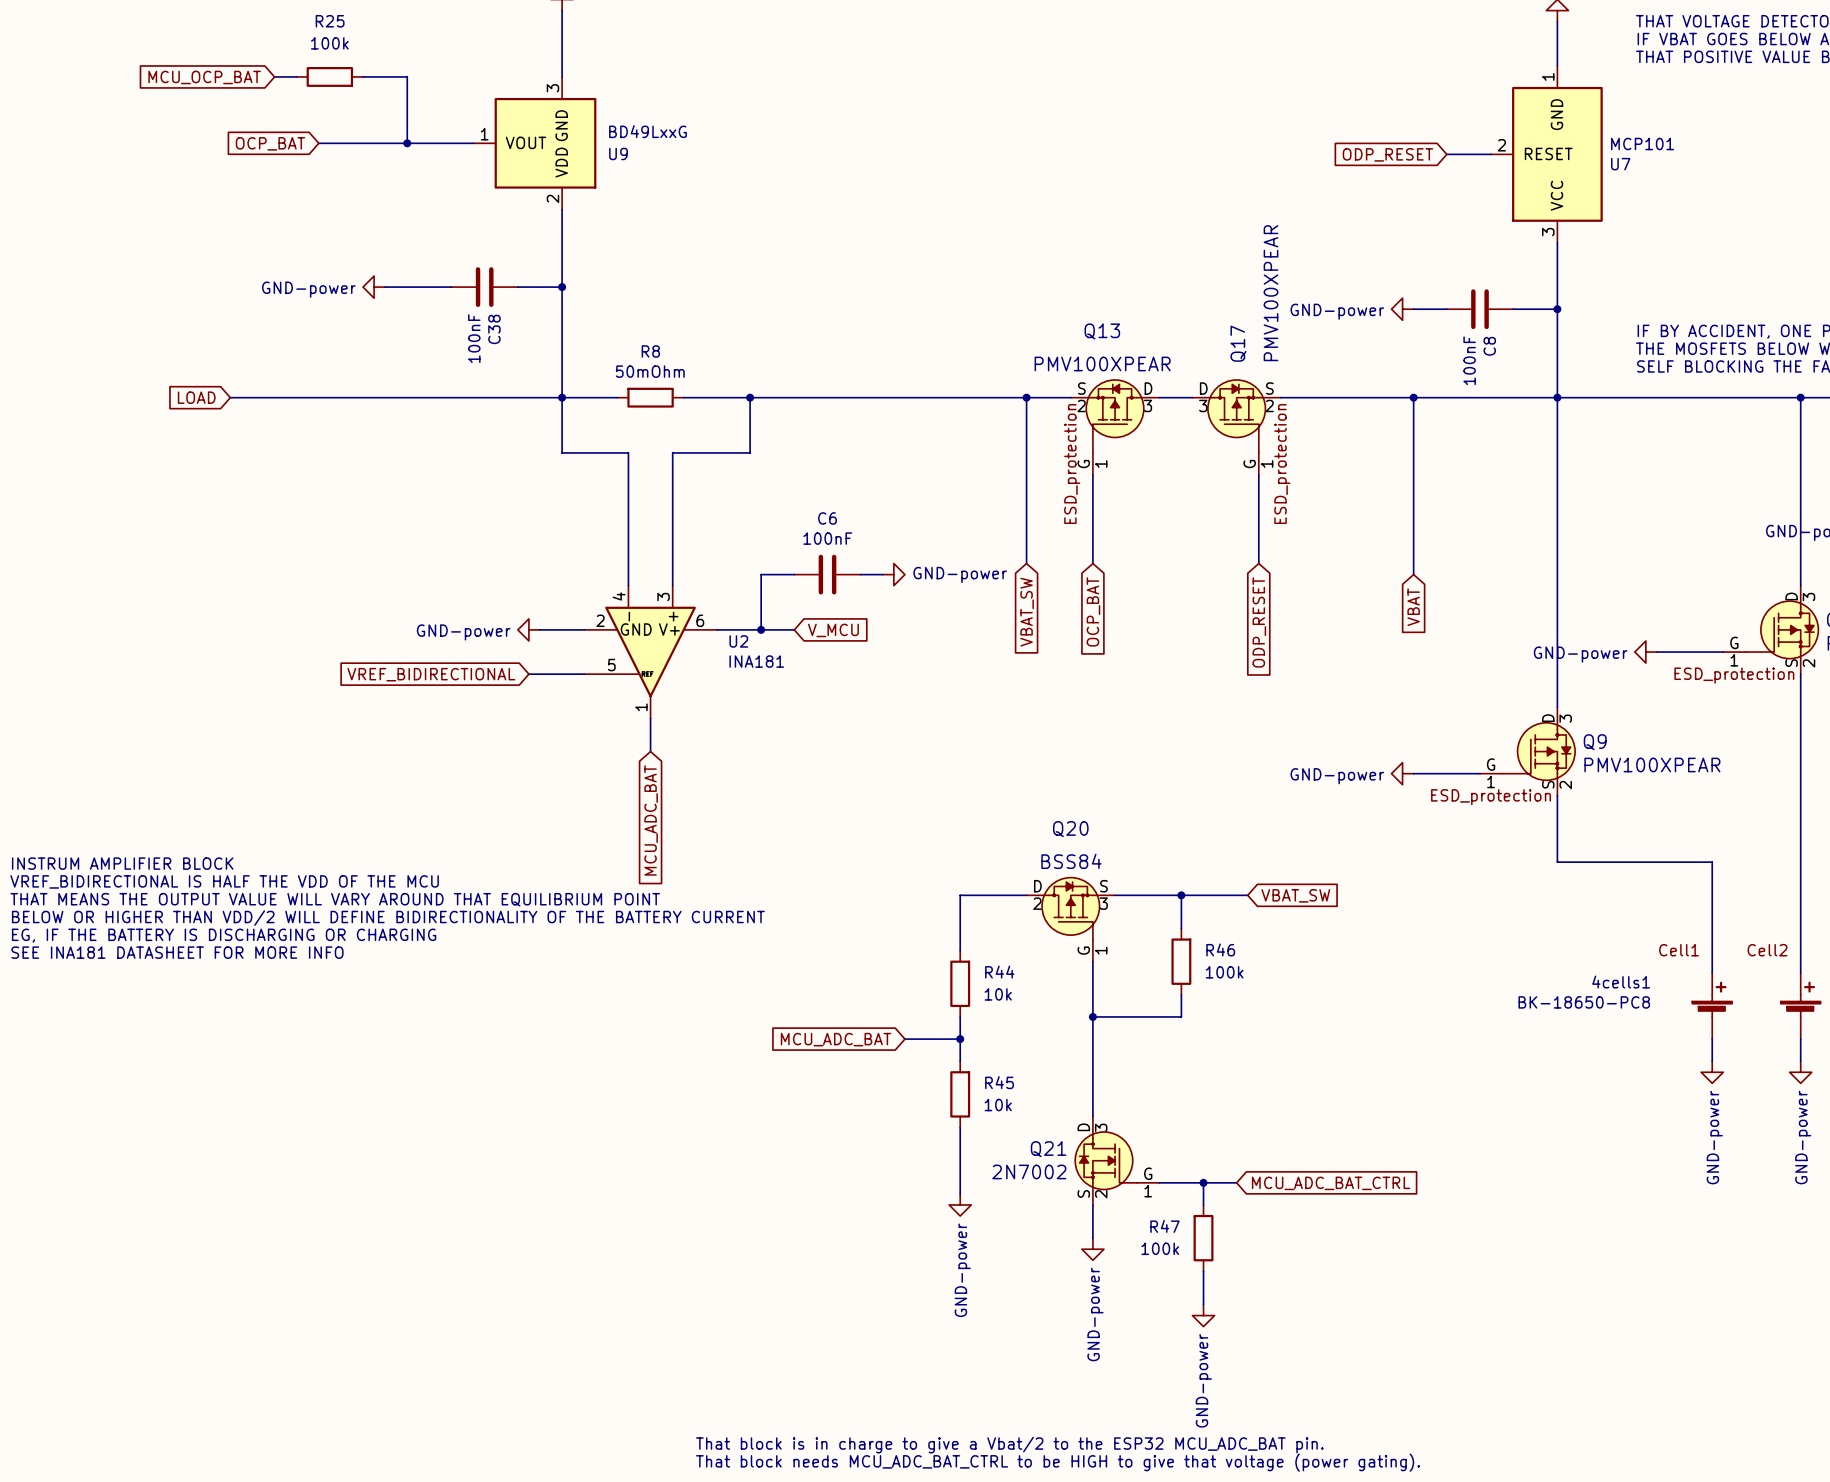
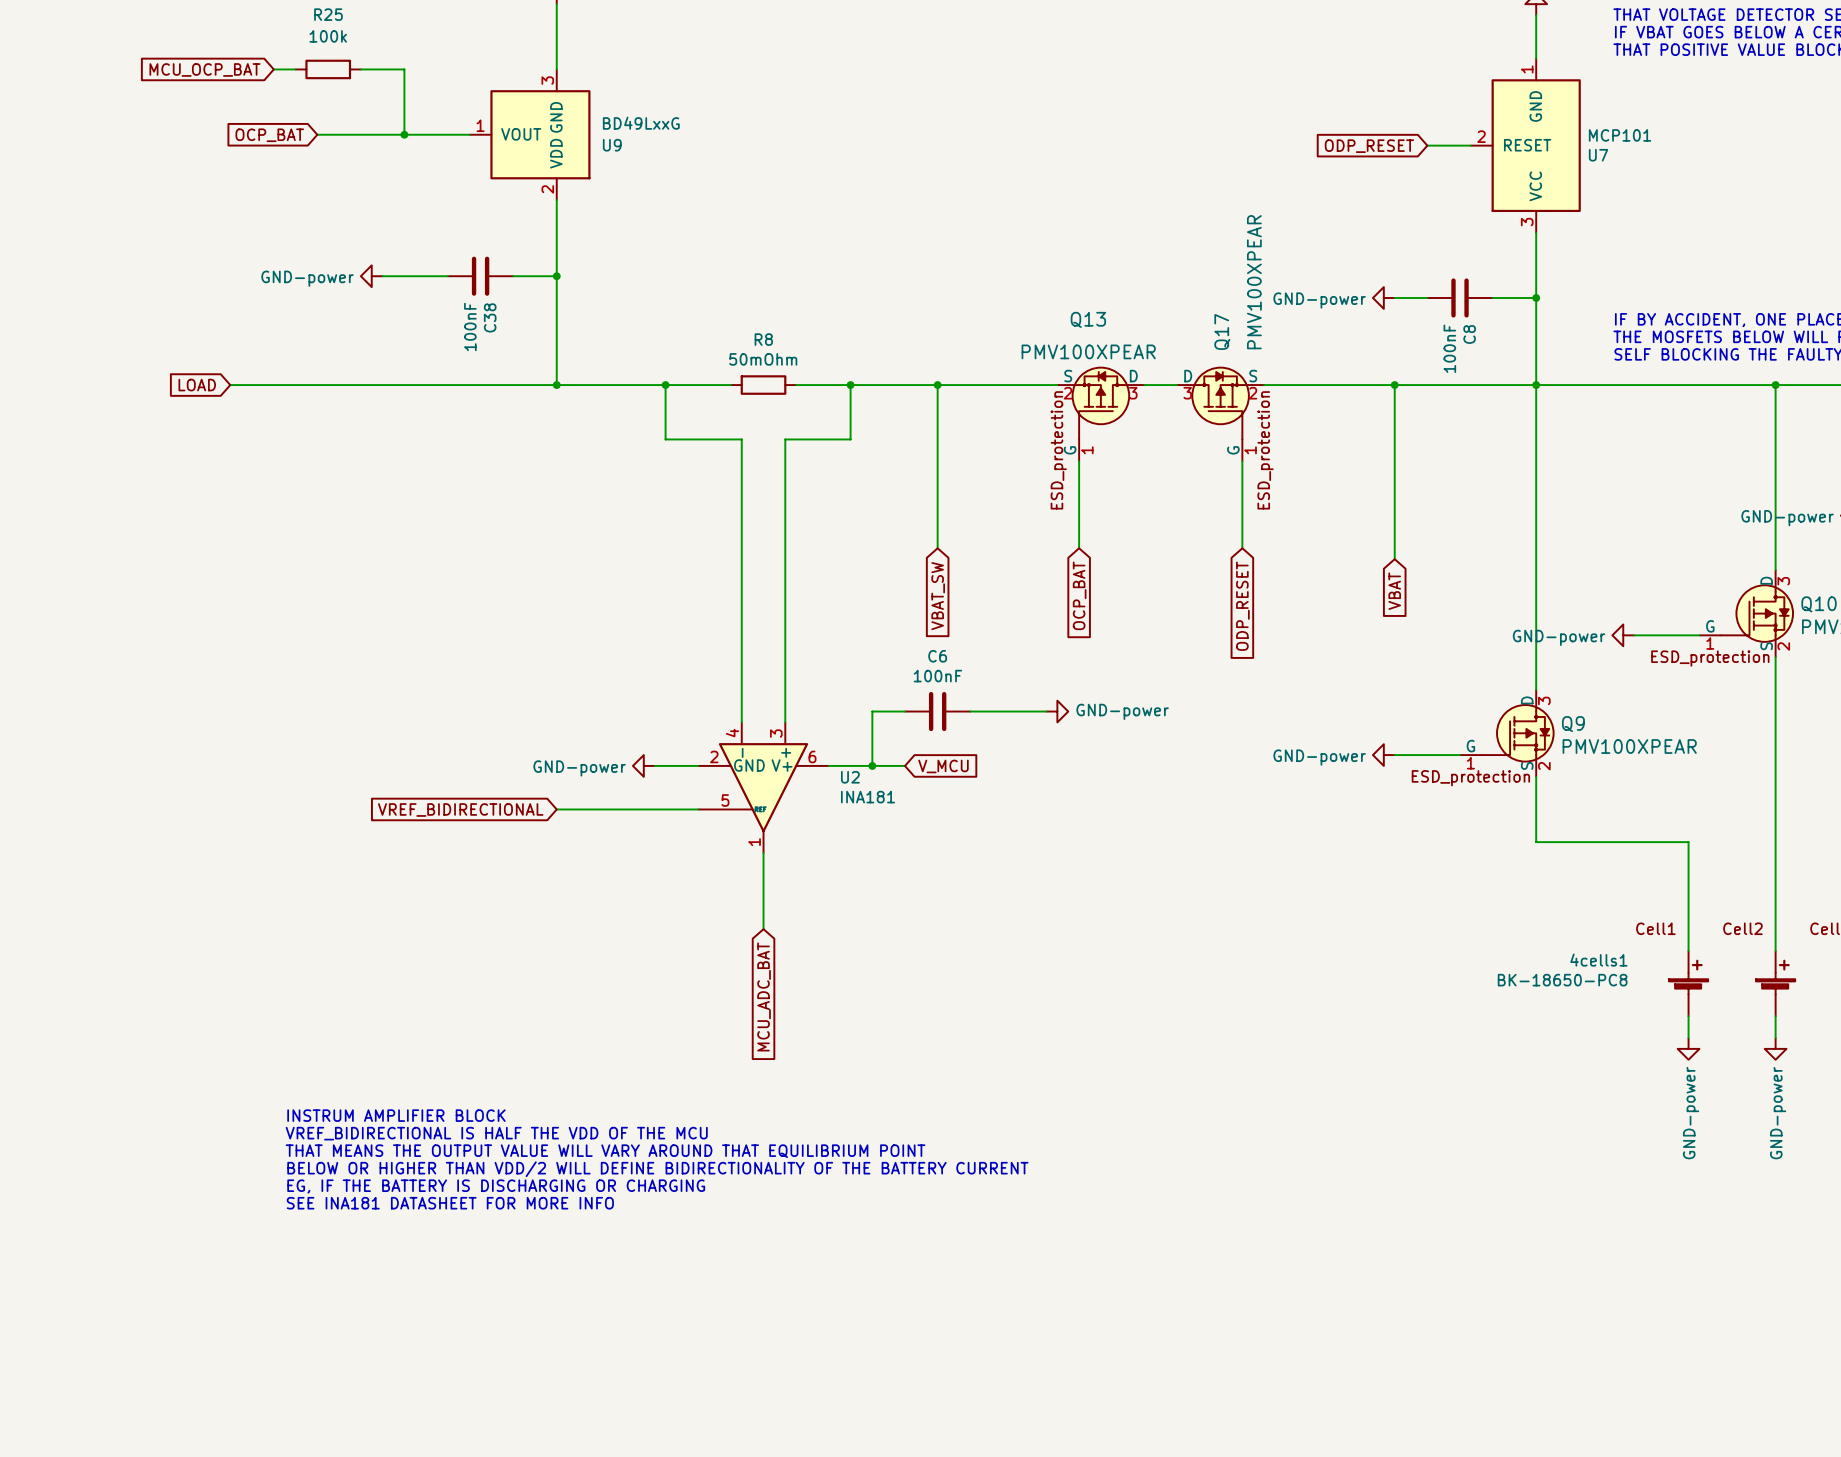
wire: (562, 397) (562, 452) (628, 452) (628, 585) -> none
R8 position: (650, 397) -> (763, 385)
junction: none -> (665, 385)
wire: (739, 397) (805, 397) -> (611, 385) (676, 385)
wire: (750, 397) (750, 452) -> (741, 722) (741, 439)
junction: (750, 397) -> none
wire: none -> (850, 385) (850, 439) (785, 439) (785, 722)
junction: none -> (850, 385)
junction: none -> (937, 385)
wire: (1026, 397) (1026, 563) -> (937, 385) (937, 548)
junction: (1026, 397) -> none
wire: (672, 452) (672, 585) -> (665, 439) (665, 385)
wire: (794, 574) (761, 574) (761, 629) -> (905, 711) (872, 711) (872, 765)
C6 position: (827, 574) -> (937, 711)
wire: (860, 574) (882, 574) -> none
power symbol: GND-power (893, 574) -> none
global label position: VBAT_SW (1027, 612) -> VBAT_SW (938, 596)
power symbol: GND-power (528, 629) -> none
wire: (539, 629) (584, 629) -> (654, 765) (698, 765)
wire: (716, 629) (794, 629) -> (828, 765) (905, 765)
junction: (761, 629) -> none
global label position: V_MCU (833, 630) -> V_MCU (943, 766)
U2 position: (650, 652) -> (763, 787)
global label position: VREF_BIDIRECTIONAL (431, 674) -> VREF_BIDIRECTIONAL (460, 809)
wire: (528, 674) (584, 674) -> none
wire: (650, 718) (650, 751) -> none
wire: none -> (970, 711) (1046, 711)
power symbol: none -> GND-power (1057, 711)
power symbol: none -> GND-power (643, 765)
junction: none -> (872, 765)
global label: MCU_ADC_BAT (651, 820) -> none
wire: none -> (556, 809) (698, 809)
text: INSTRUM AMPLIFIER BLOCK (122, 863) -> none
wire: none -> (763, 853) (763, 929)
text: VREF_BIDIRECTIONAL IS HALF THE VDD OF THE MCU (224, 881) -> none
wire: (1026, 895) (960, 895) (960, 950) -> none
wire: (1115, 895) (1247, 895) -> none
wire: (1181, 895) (1181, 928) -> none
junction: (1181, 895) -> none
global label: VBAT_SW (1295, 895) -> none
text: THAT MEANS THE OUTPUT VALUE WILL VARY AROUND THAT EQUILIBRIUM POINT (335, 899) -> none
text: BELOW OR HIGHER THAN VDD/2 WILL DEFINE BIDIRECTIONALITY OF THE BATTERY CURRENT (388, 918) -> none
Q20: BSS84 (1070, 919) -> none
text: EG, IF THE BATTERY IS DISCHARGING OR CHARGING (224, 935) -> none
text: SEE INA181 DATASHEET FOR MORE INFO (177, 952) -> none
wire: (1092, 961) (1092, 1116) -> none
R46: 100k (1181, 961) -> none
R44: 10k (960, 983) -> none
wire: (1181, 994) (1181, 1016) (1092, 1016) -> none
wire: (960, 1016) (960, 1061) -> none
junction: (1092, 1016) -> none
global label rotation: 0° (836, 1039) -> 90° counterclockwise (764, 996)
wire: (904, 1039) (960, 1039) -> none
junction: (960, 1039) -> none
R45: 10k (960, 1094) -> none
wire: (960, 1127) (960, 1193) -> none
text: none -> INSTRUM AMPLIFIER BLOCK (396, 1115)
text: none -> VREF_BIDIRECTIONAL IS HALF THE VDD OF THE MCU (496, 1133)
Q21: 2N7002 (1117, 1160) -> none
text: none -> THAT MEANS THE OUTPUT VALUE WILL VARY AROUND THAT EQUILIBRIUM POINT (605, 1151)
wire: (1159, 1182) (1236, 1182) -> none
wire: (1203, 1182) (1203, 1204) -> none
junction: (1203, 1182) -> none
global label: MCU_ADC_BAT_CTRL (1331, 1183) -> none
text: none -> BELOW OR HIGHER THAN VDD/2 WILL DEFINE BIDIRECTIONALITY OF THE BATTERY CURRENT (657, 1169)
power symbol: GND-power (960, 1204) -> none
wire: (1092, 1204) (1092, 1238) -> none
text: none -> EG, IF THE BATTERY IS DISCHARGING OR CHARGING (496, 1186)
text: none -> SEE INA181 DATASHEET FOR MORE INFO (450, 1203)
R47: 100k (1203, 1238) -> none
power symbol: GND-power (1092, 1249) -> none
wire: (1203, 1271) (1203, 1304) -> none
power symbol: GND-power (1203, 1315) -> none
text: That block is in charge to give a Vbat/2 to the ESP32 MCU_ADC_BAT pin. (1009, 1445) -> none
text: That block needs MCU_ADC_BAT_CTRL to be HIGH to give that voltage (power gating). (1057, 1462) -> none

